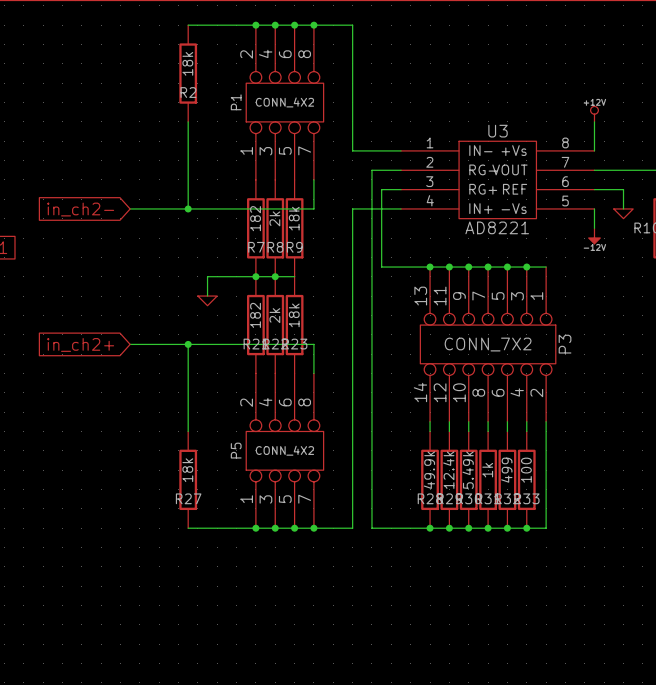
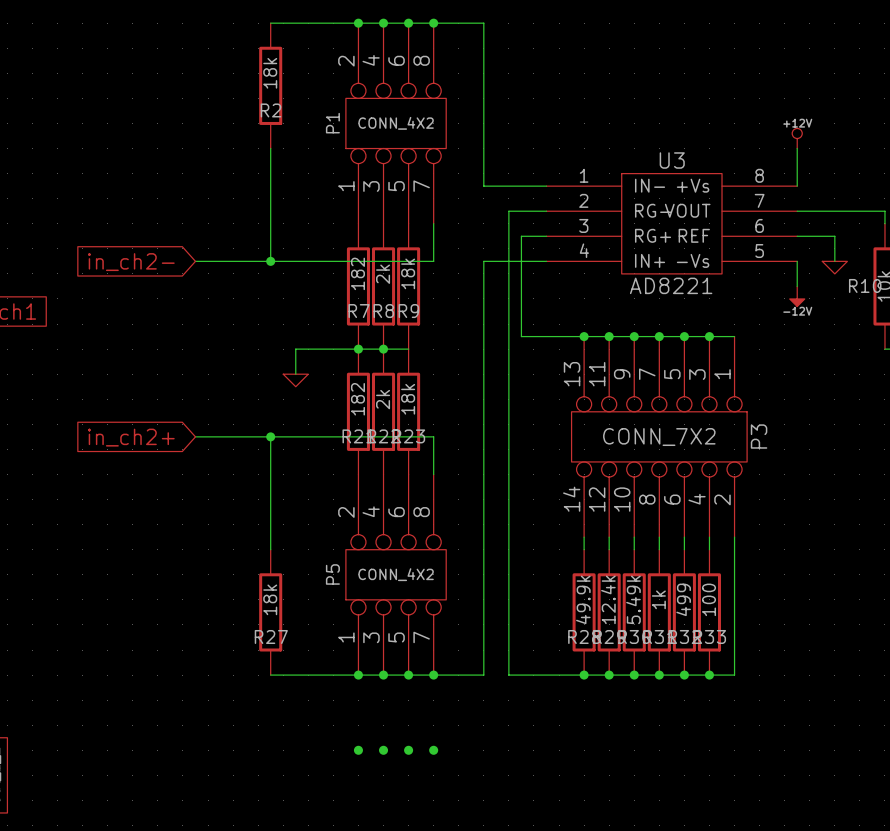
junction: none -> (358, 750)
junction: none -> (383, 750)
junction: none -> (408, 750)
junction: none -> (433, 750)

